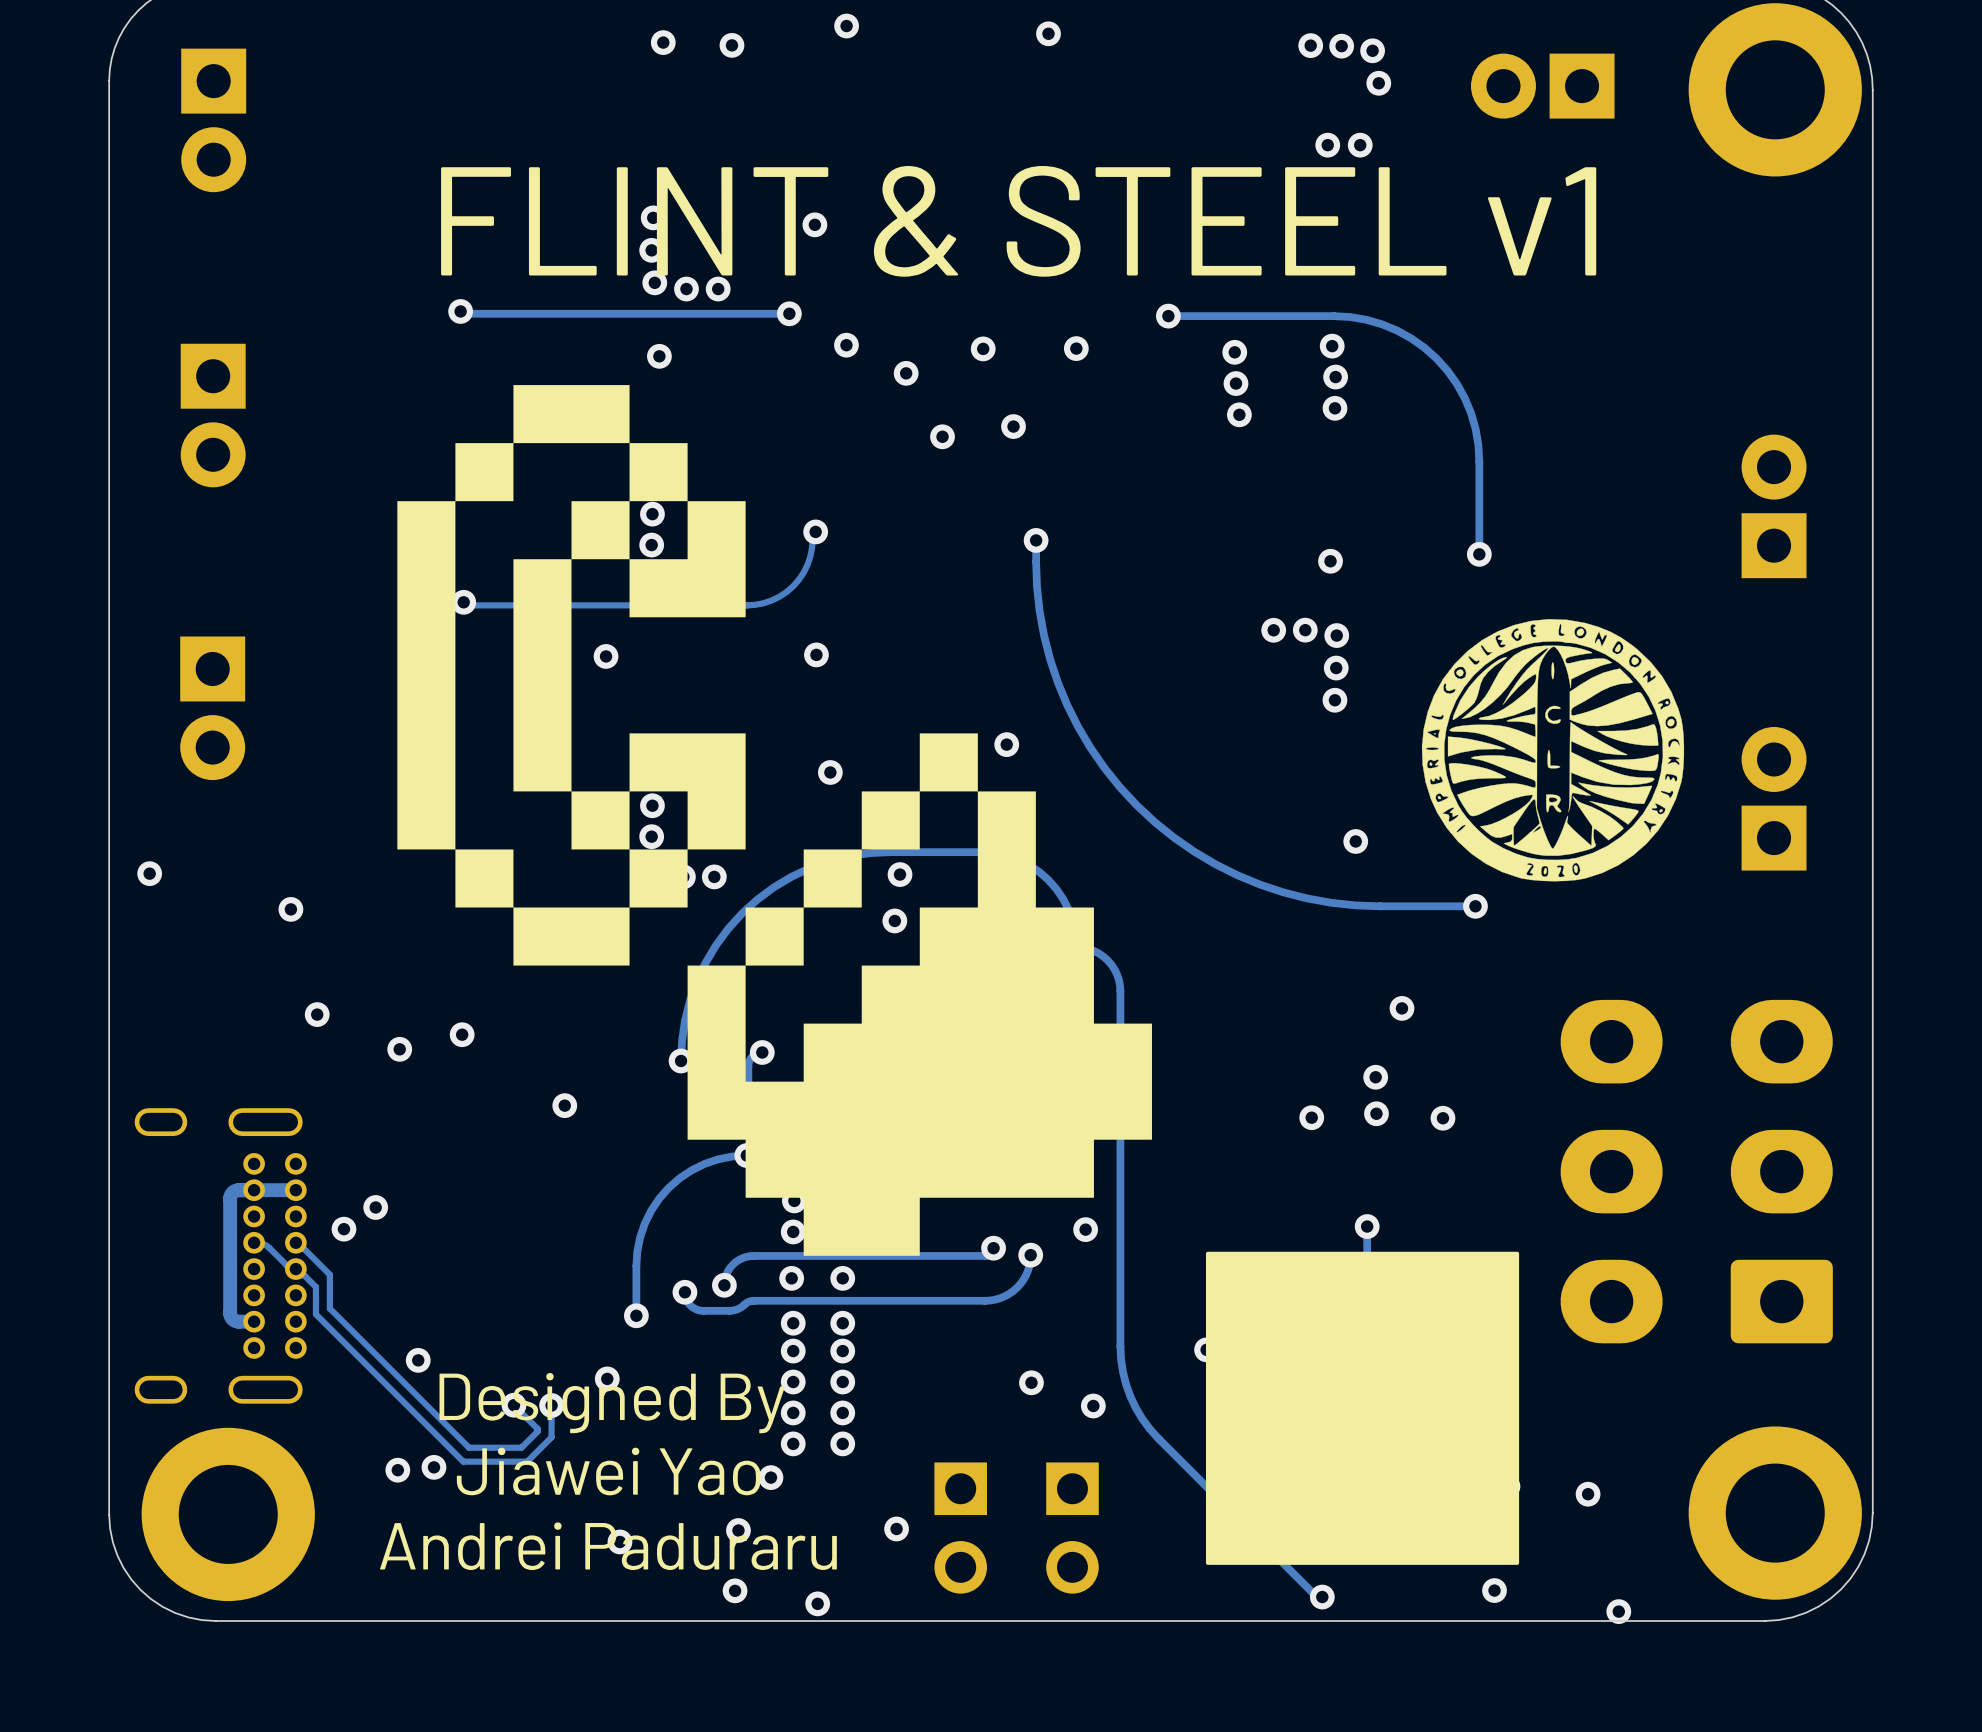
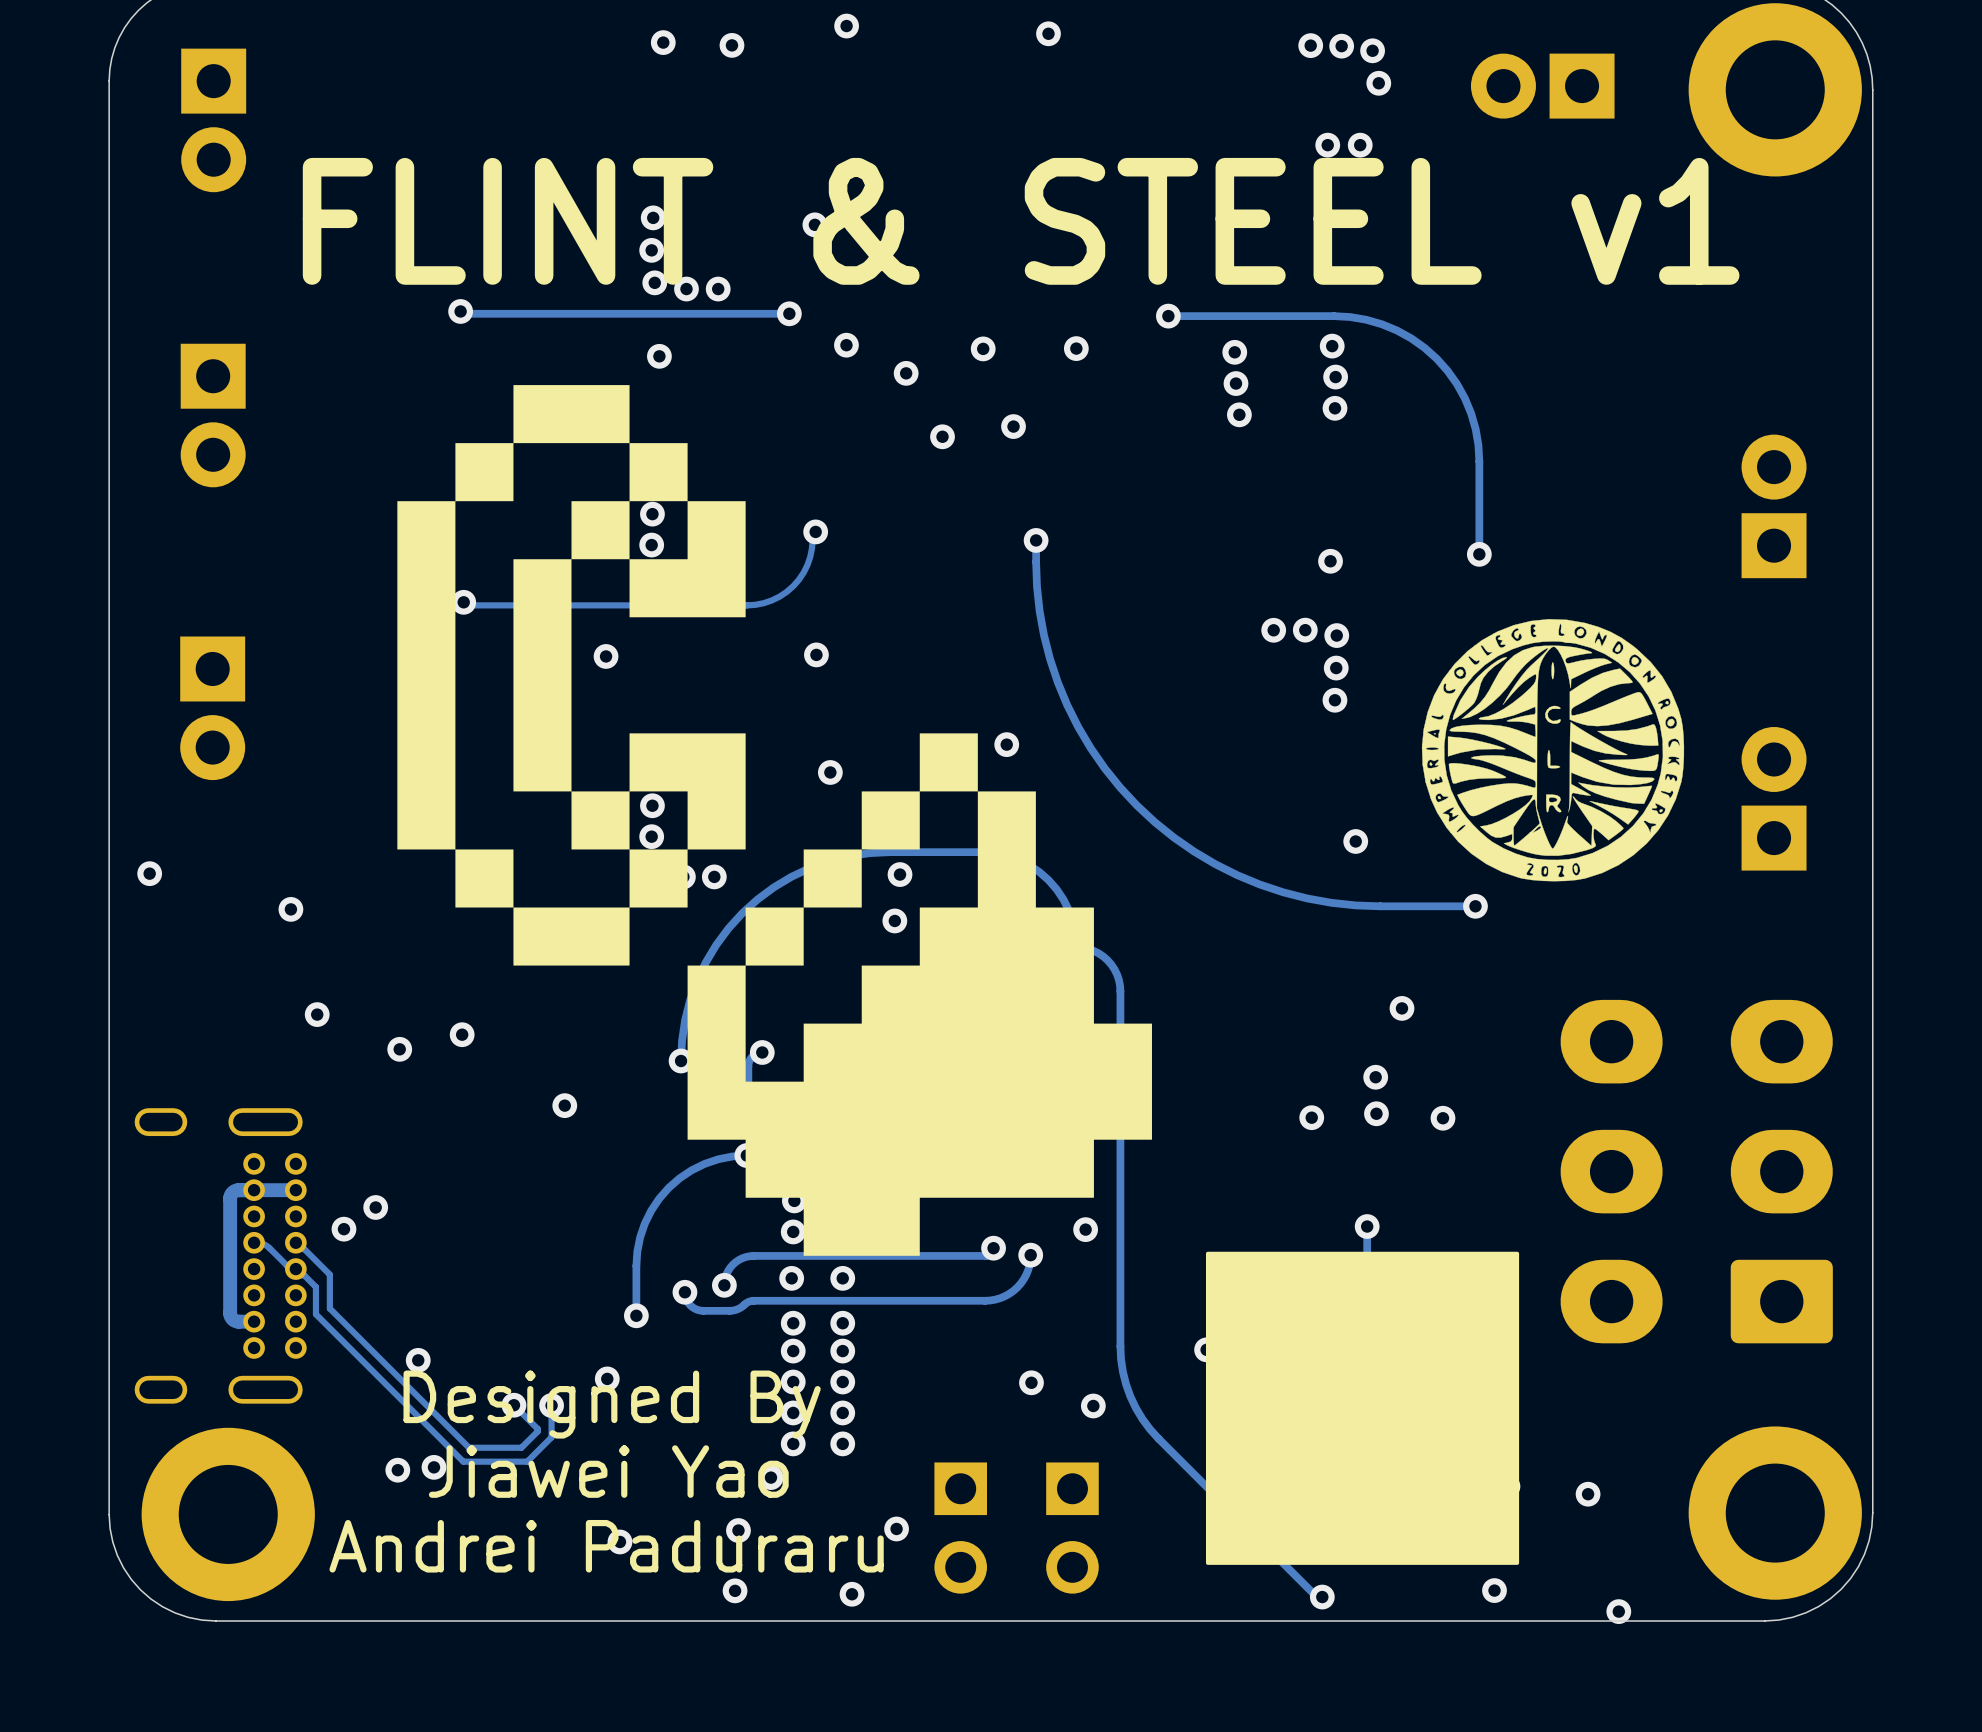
via position: (817, 1603) -> (852, 1594)

